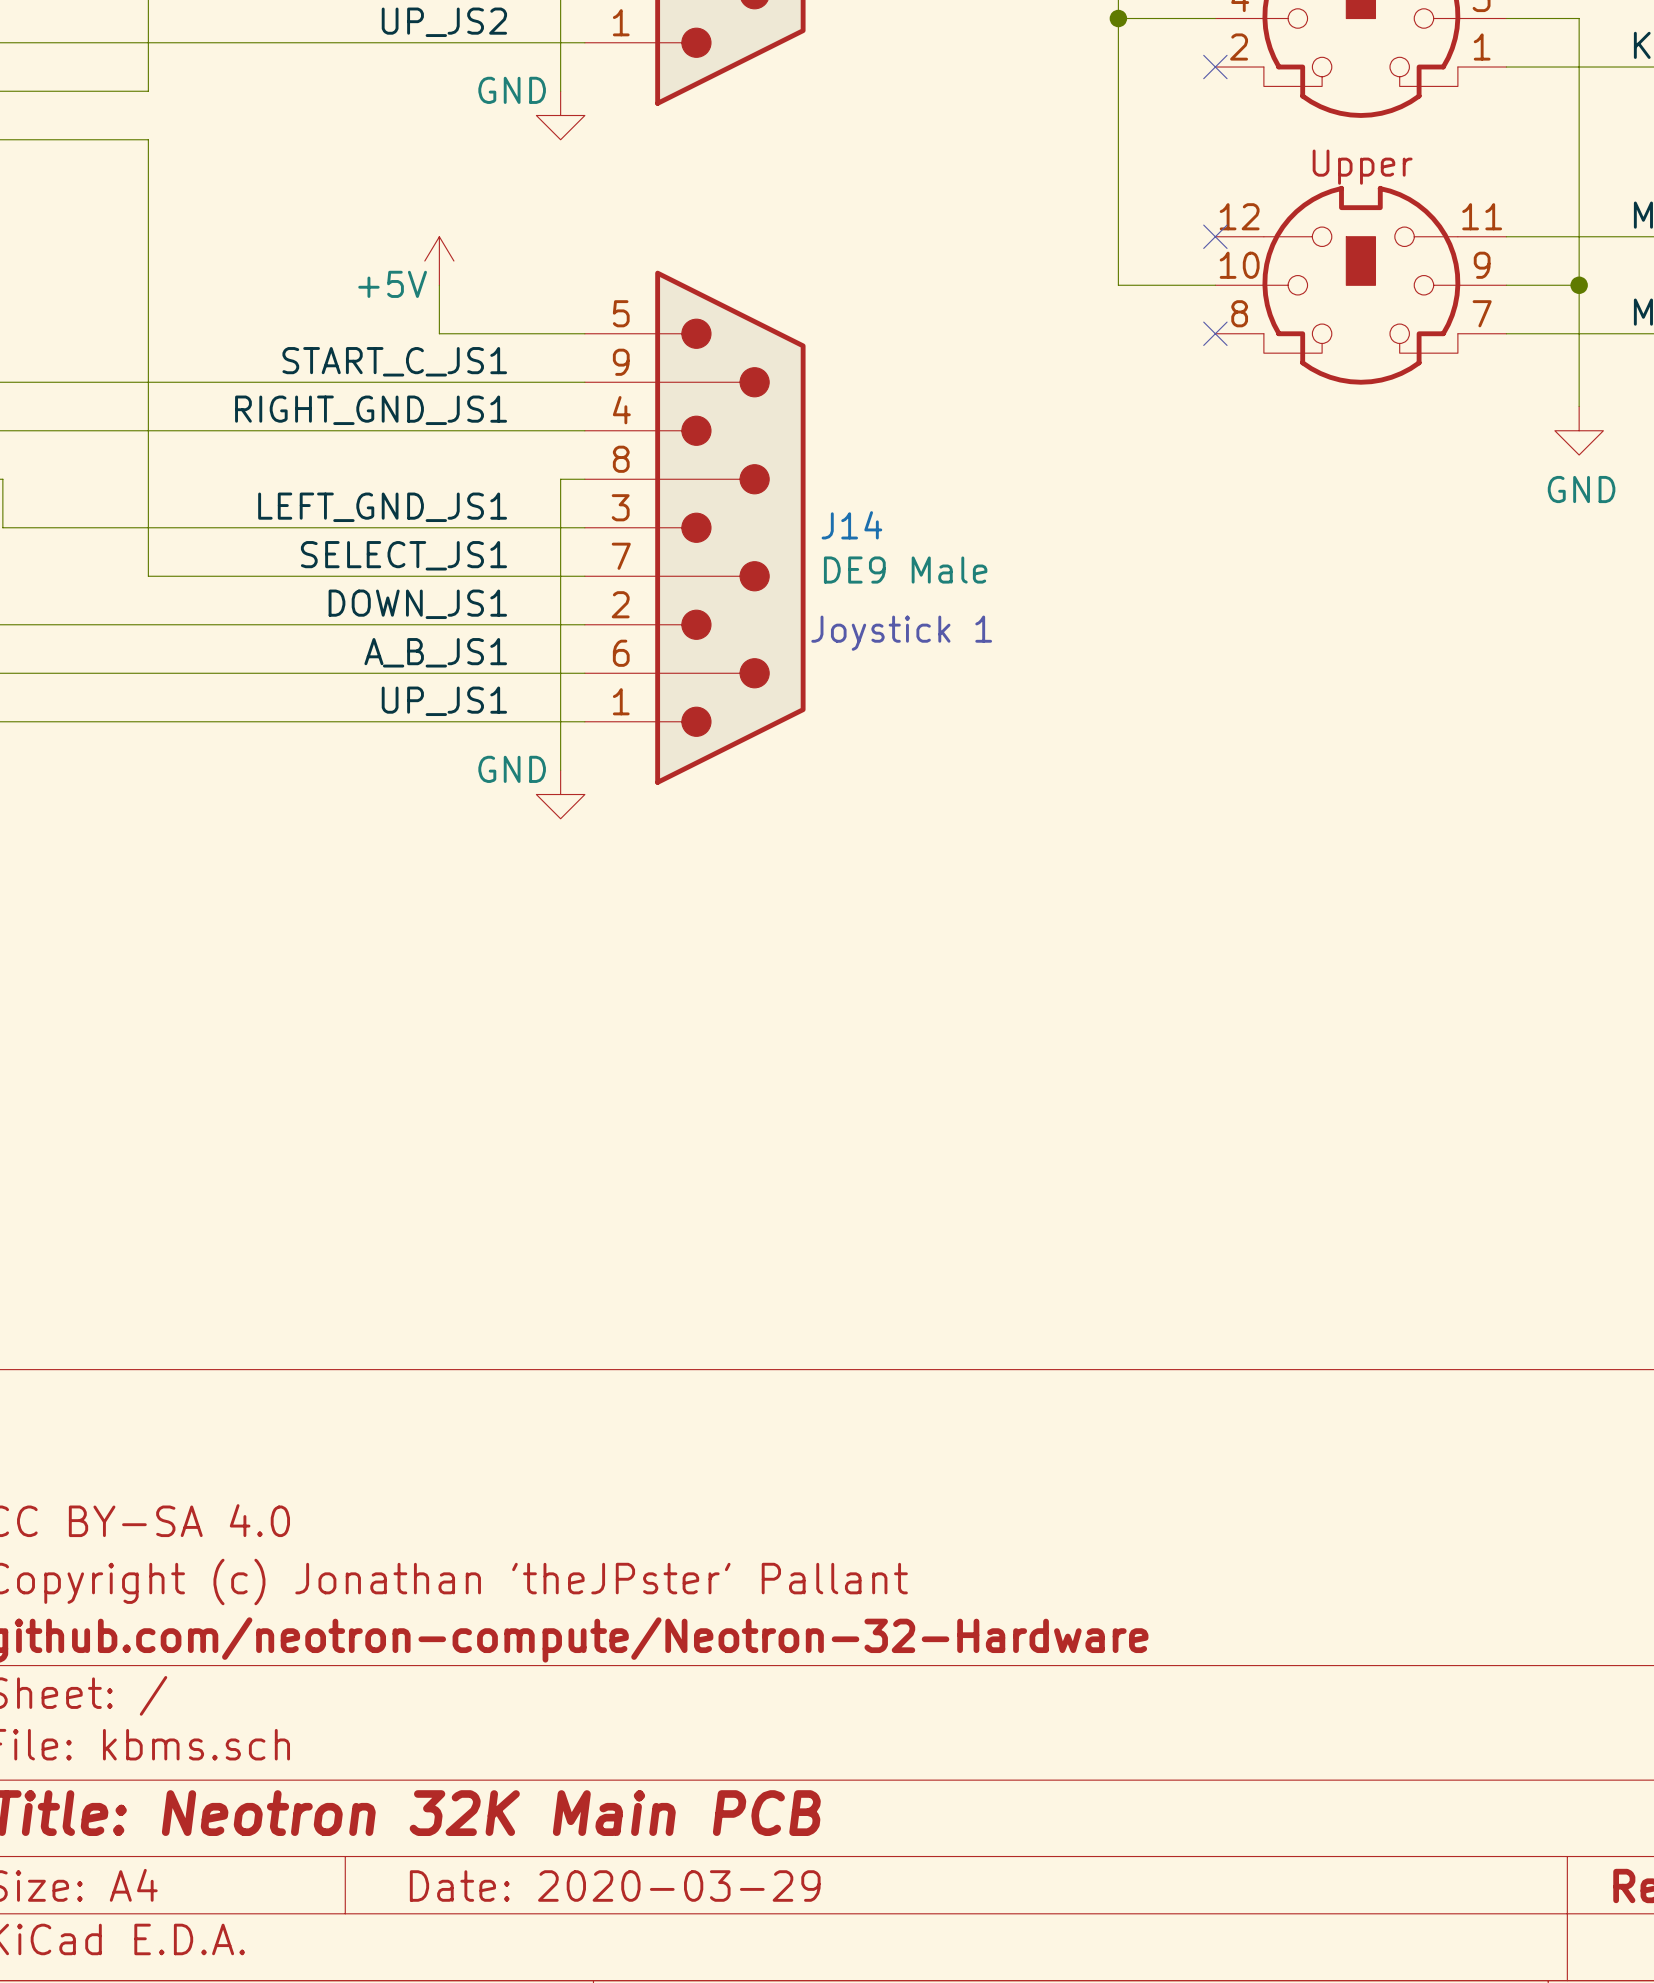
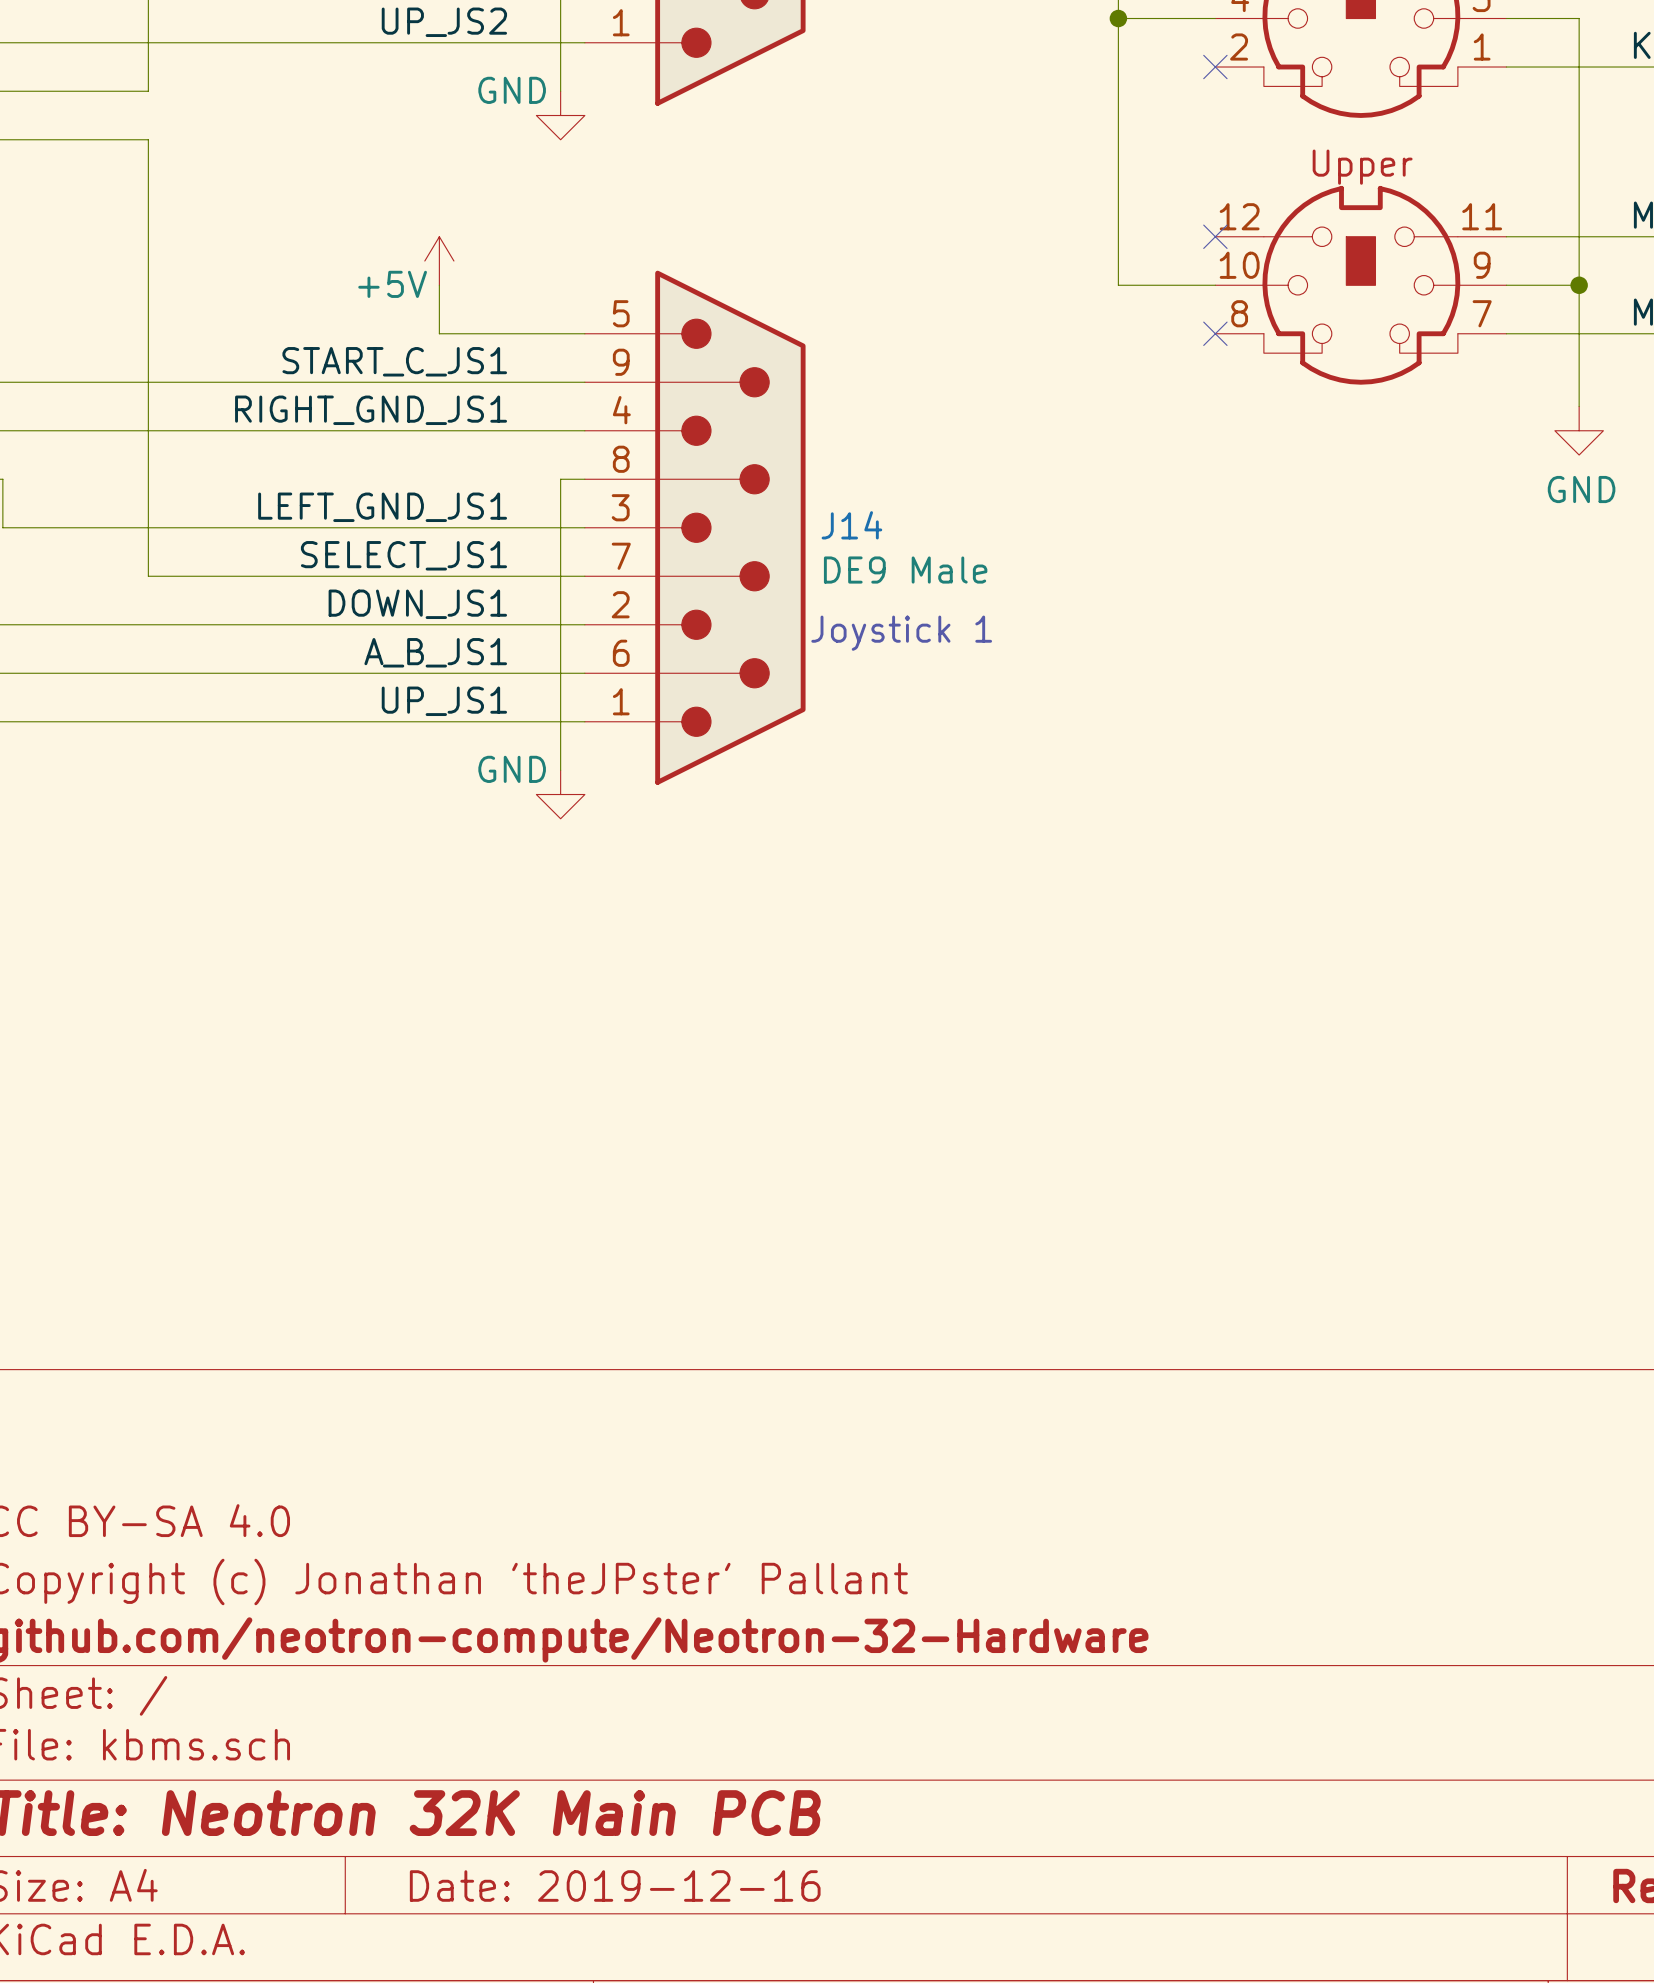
title block: Date: 2020-03-29 (615, 1886) -> Date: 2019-12-16 (615, 1886)

